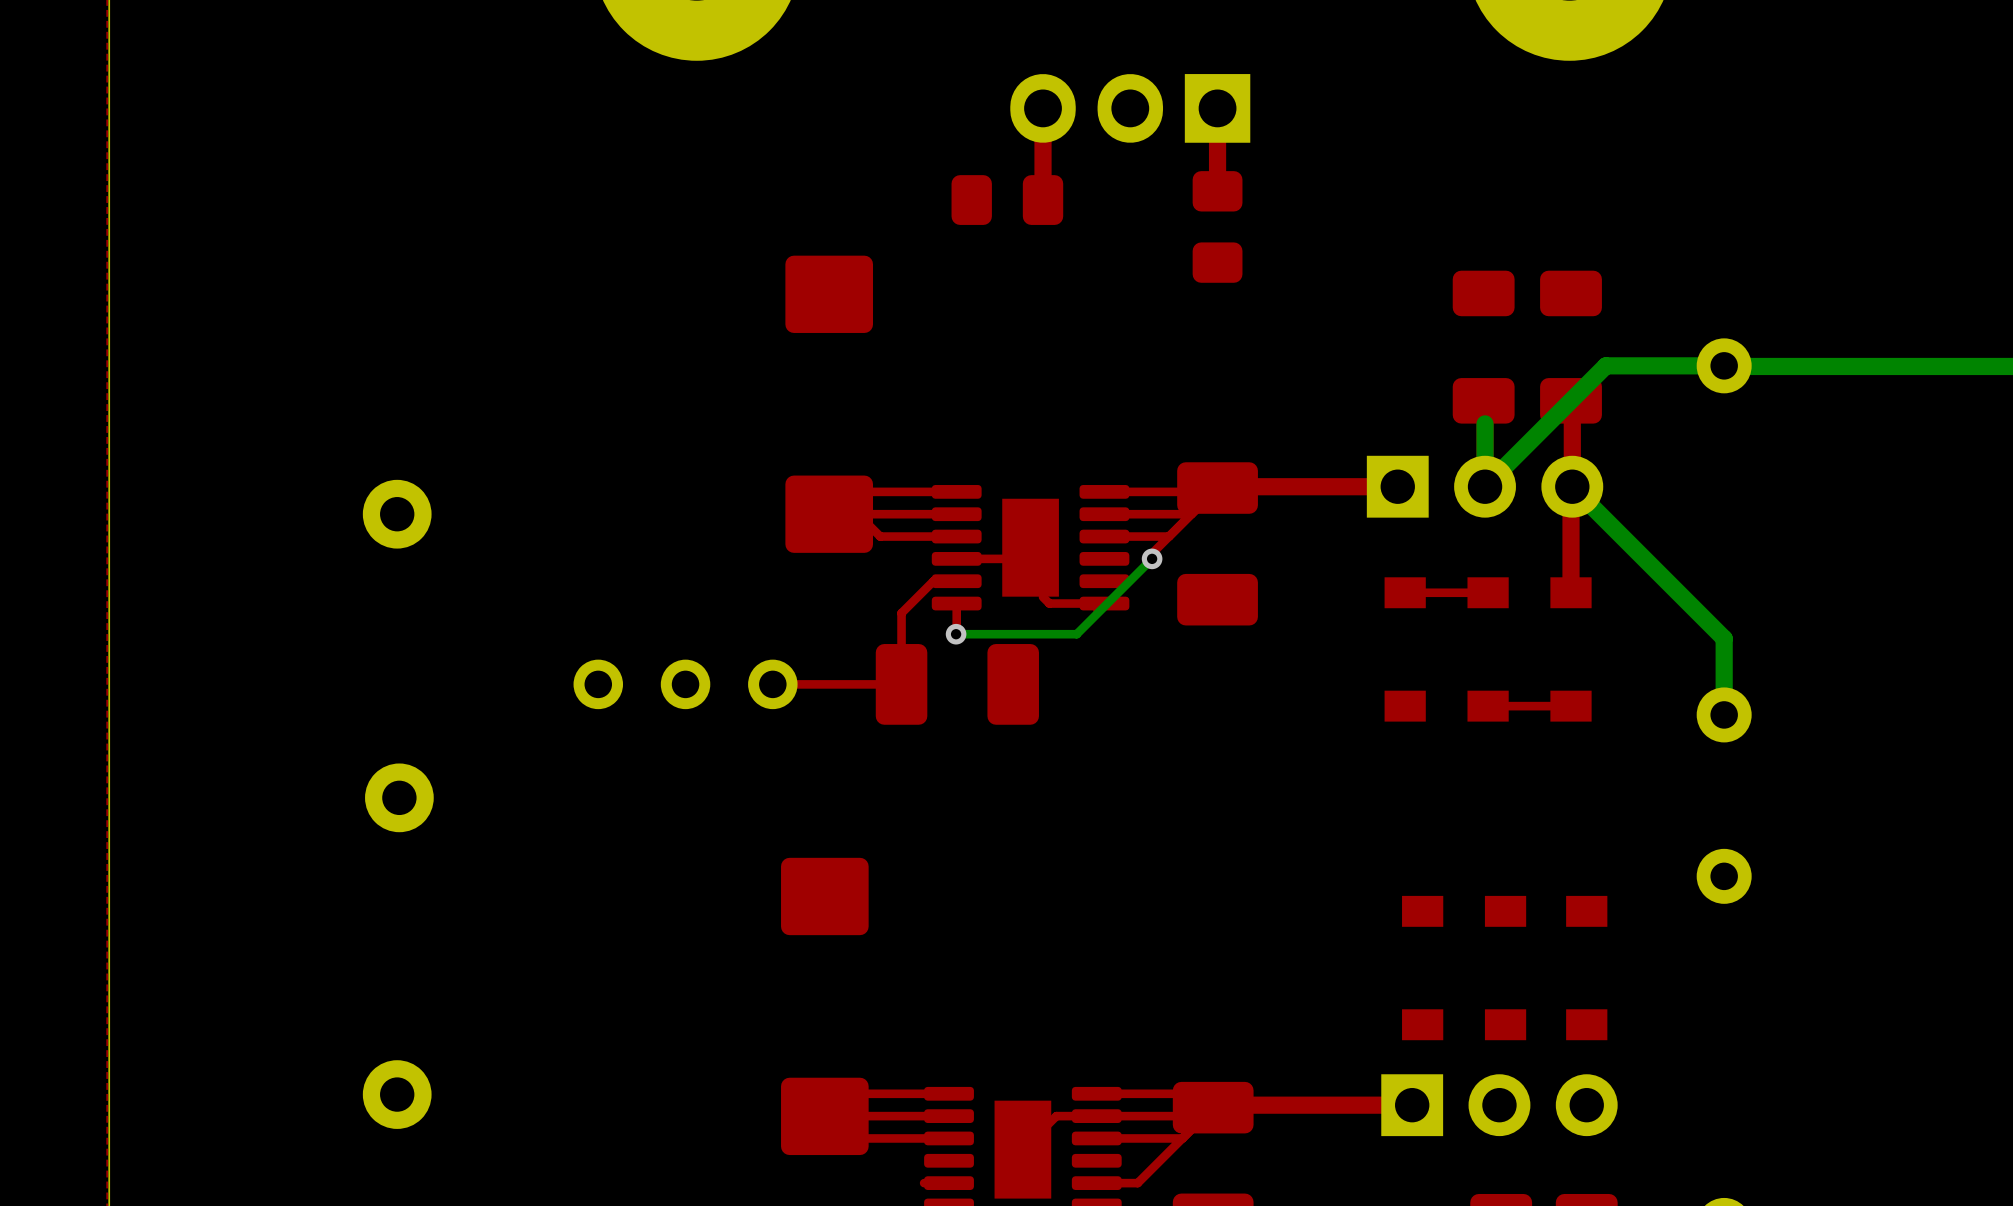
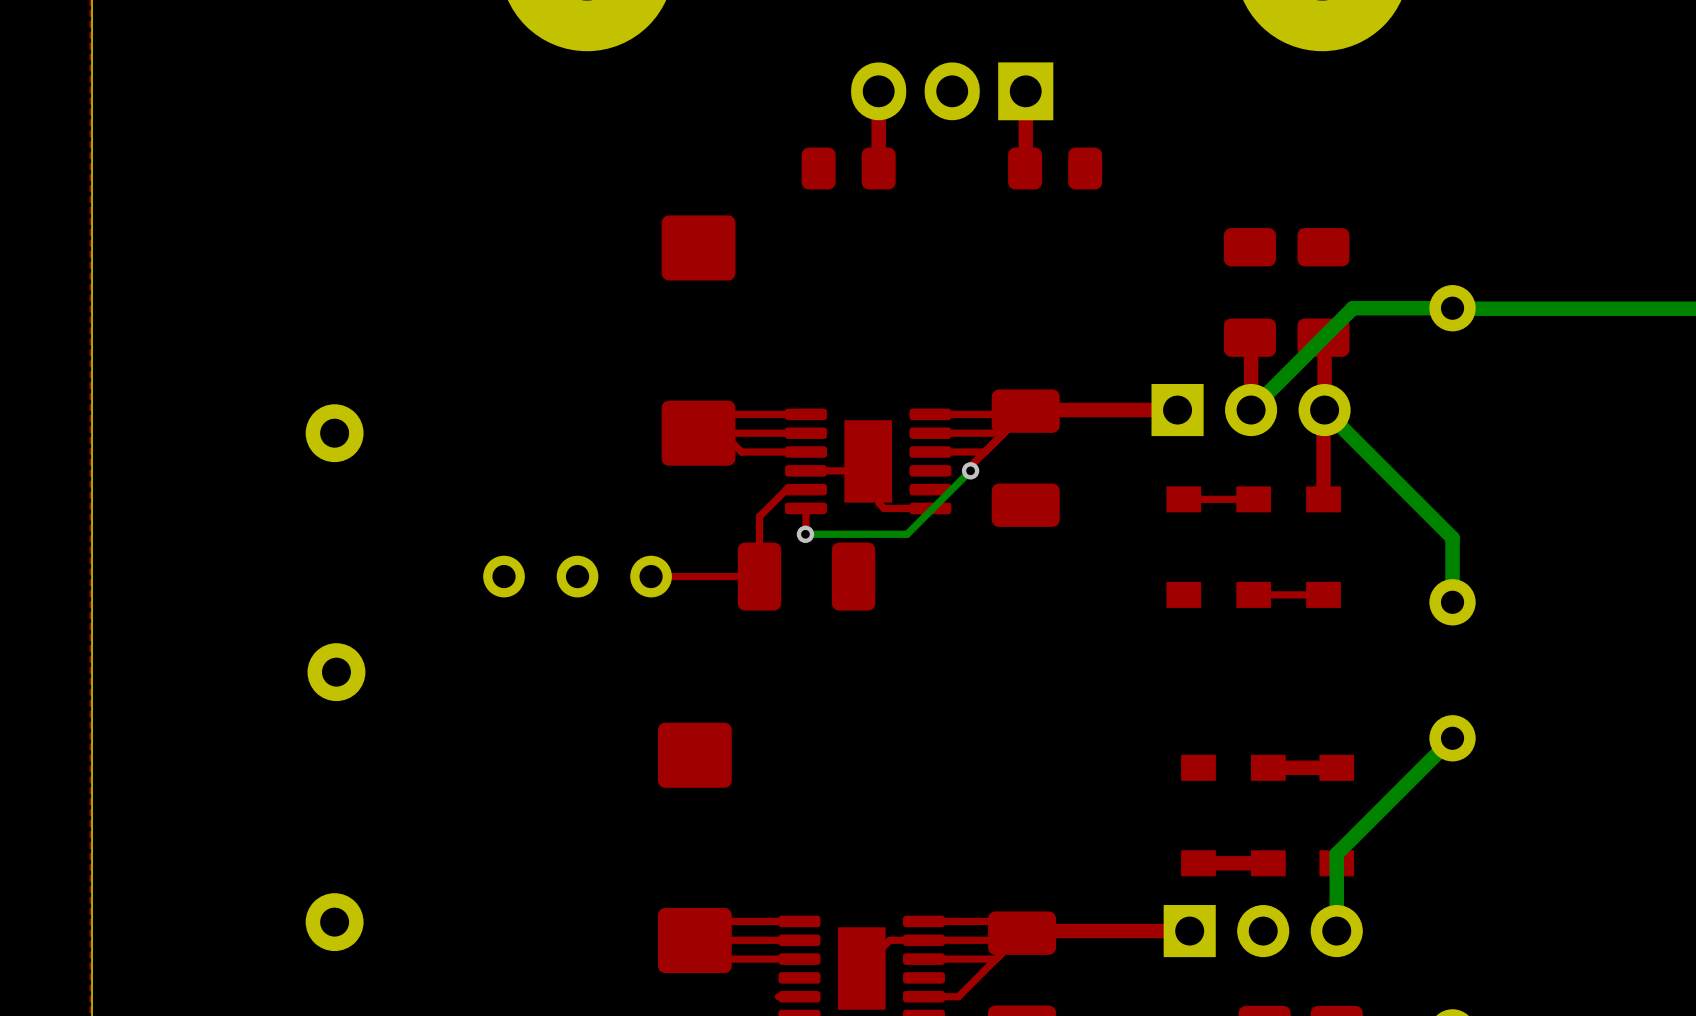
part rotation: 0° (1217, 226) -> 90° clockwise (1055, 168)
bottom track: (1485, 423) (1485, 486) -> none
bottom track: none -> (1452, 738) (1336, 854) (1336, 931)
top track: none -> (1336, 767) (1268, 767)
top track: none -> (1268, 863) (1198, 863)

